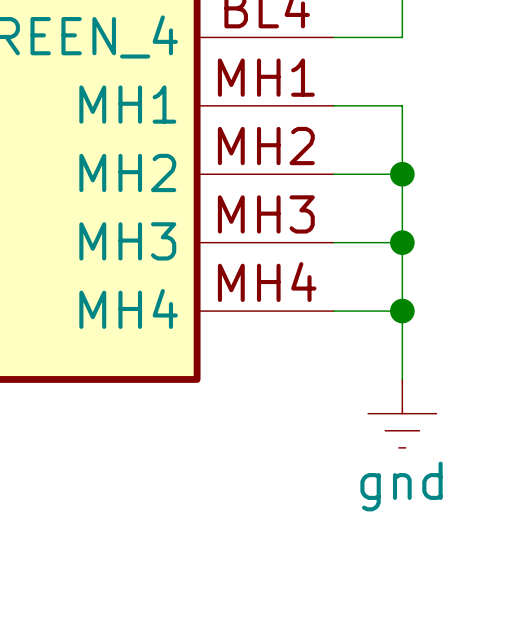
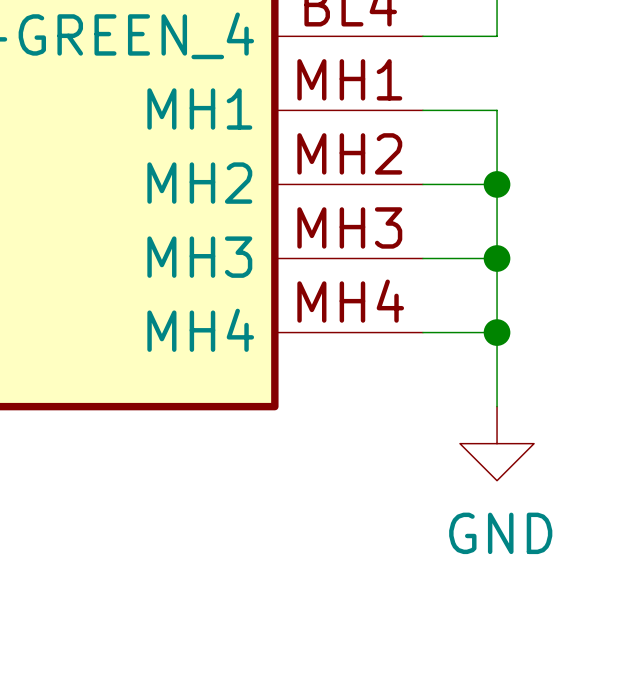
power symbol: gnd (402, 413) -> GND (497, 443)

